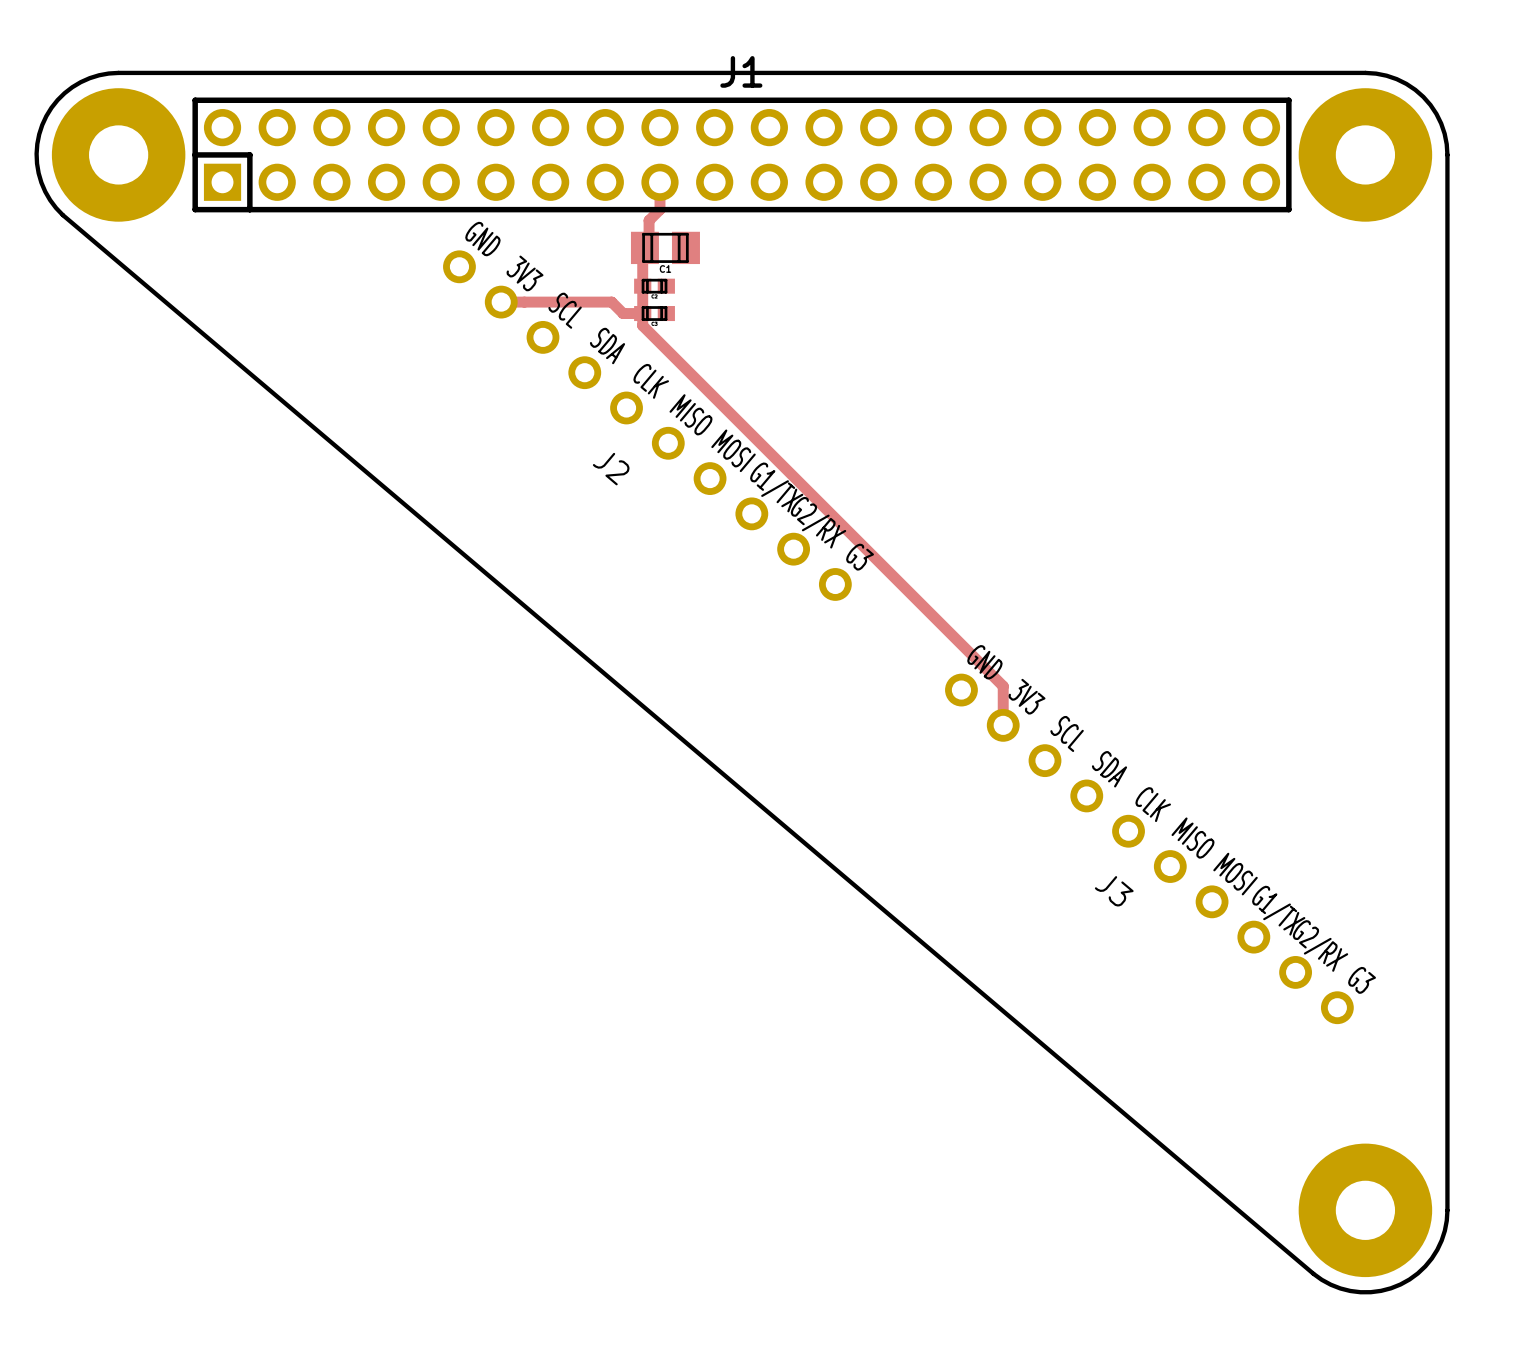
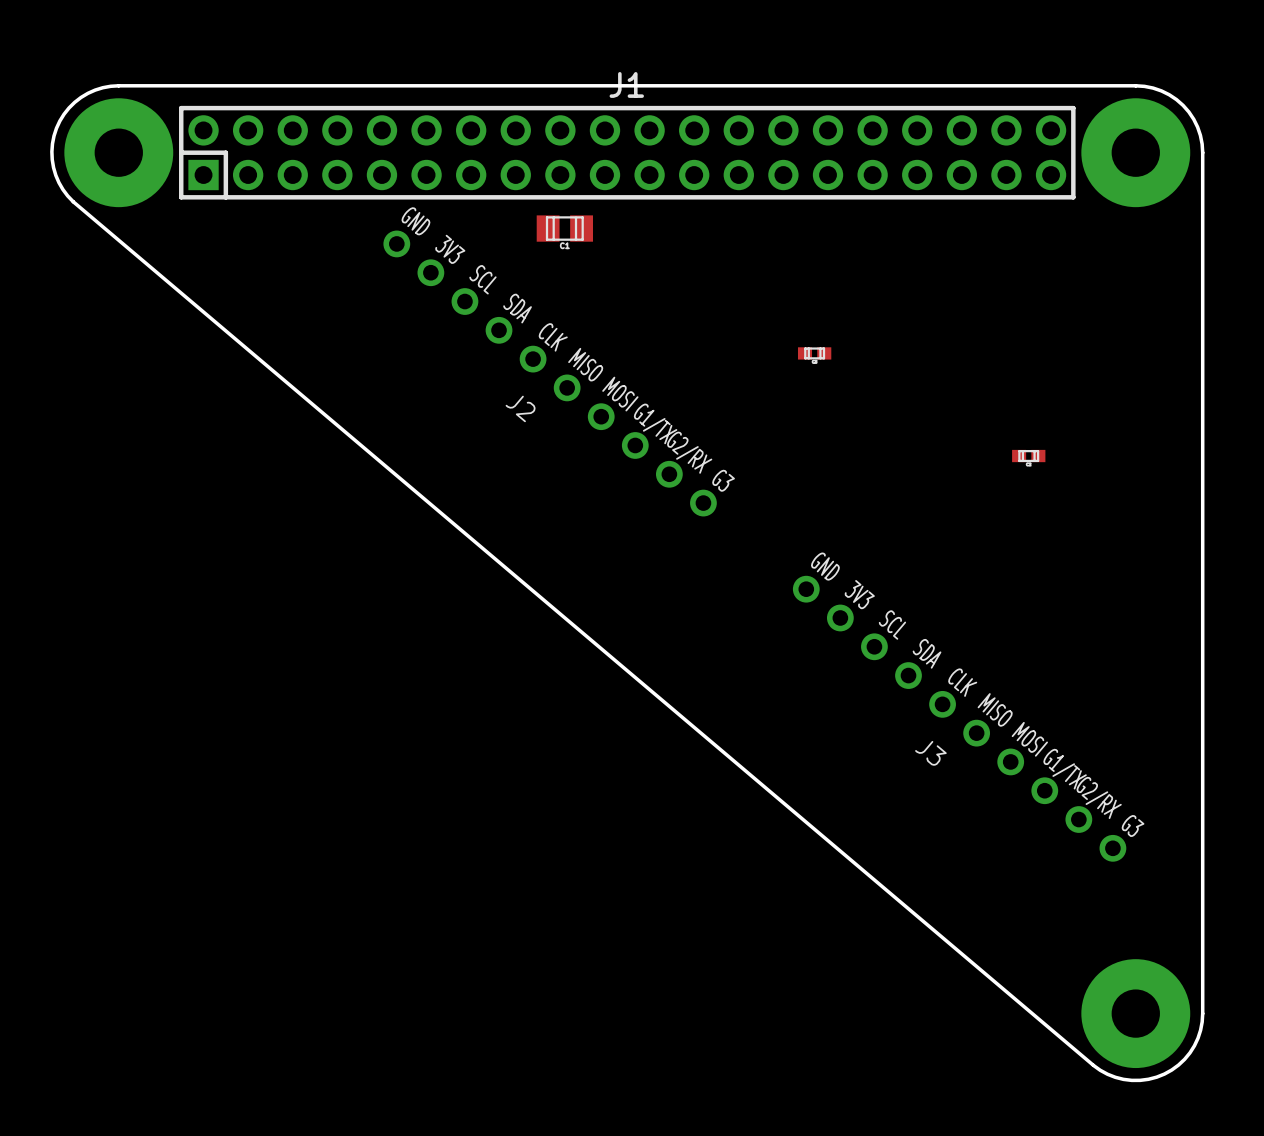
top track: (659, 182) (659, 209) (649, 220) (649, 243) (642, 250) (642, 325) (1003, 686) (1003, 725) -> none
part position: (654, 286) -> (1028, 456)
top track: (501, 302) (611, 302) (623, 313) (642, 313) -> none
part position: (654, 313) -> (814, 353)

